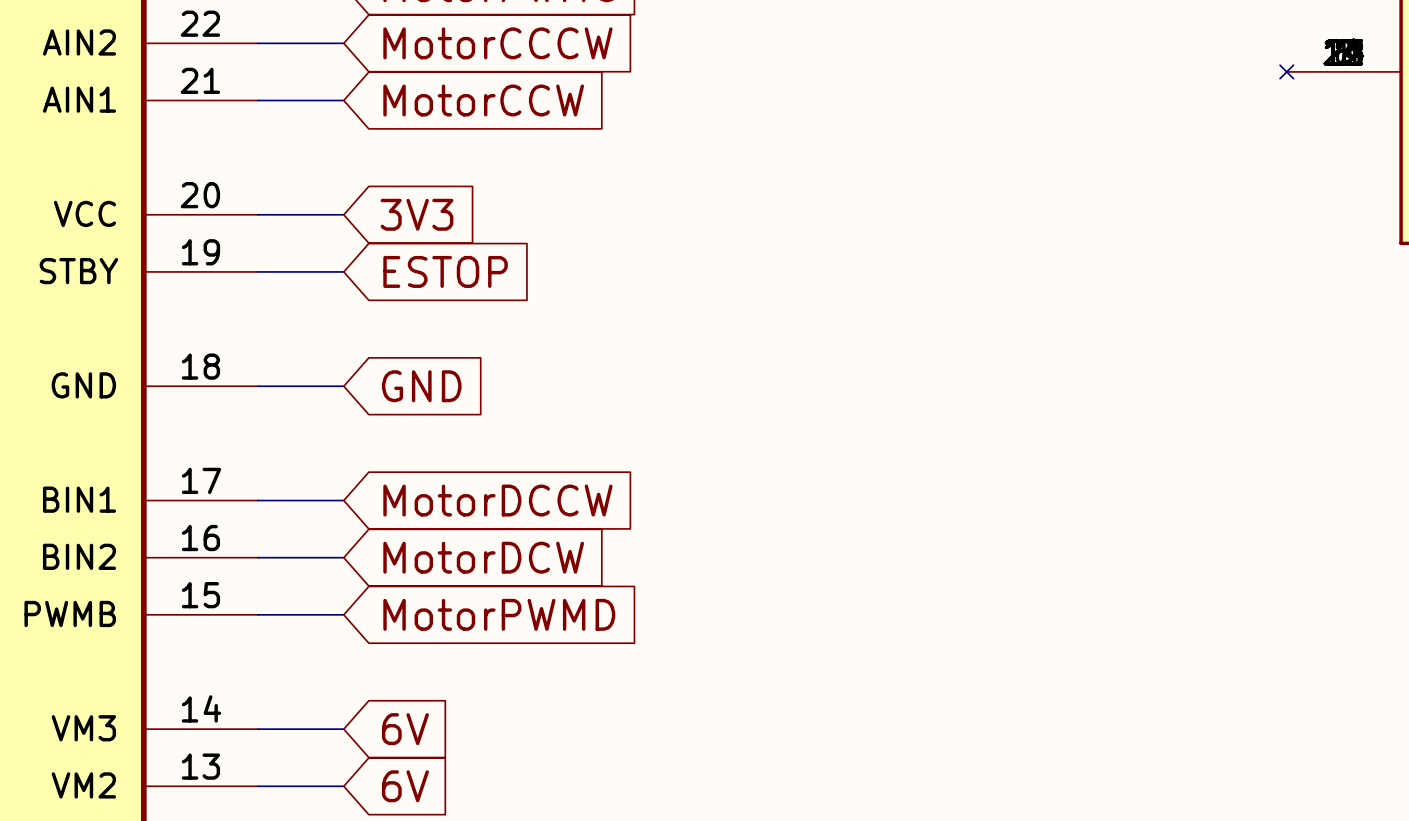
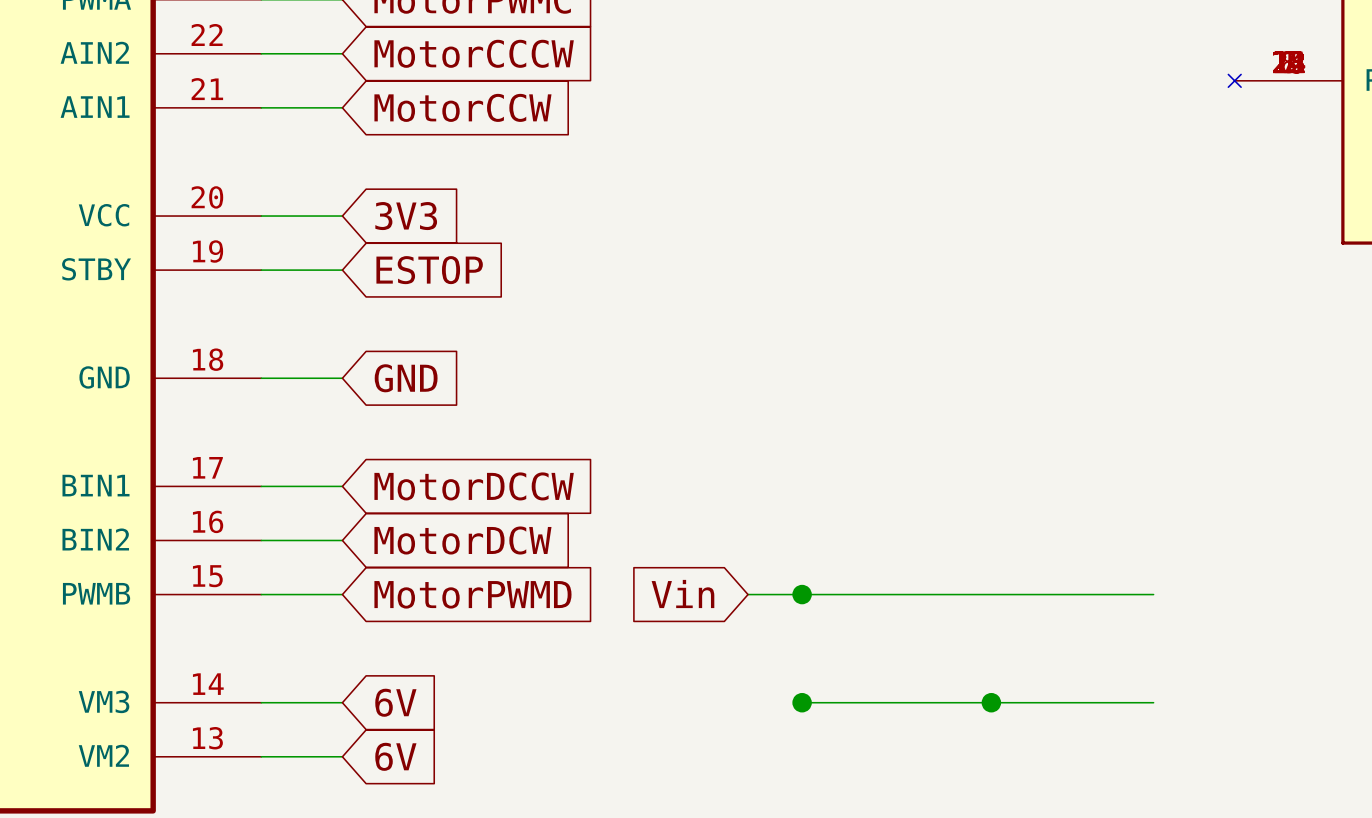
global label: none -> Vin (682, 593)
wire: none -> (748, 594) (1153, 594)
junction: none -> (802, 594)
wire: none -> (802, 702) (1153, 702)
junction: none -> (802, 702)
junction: none -> (991, 702)

